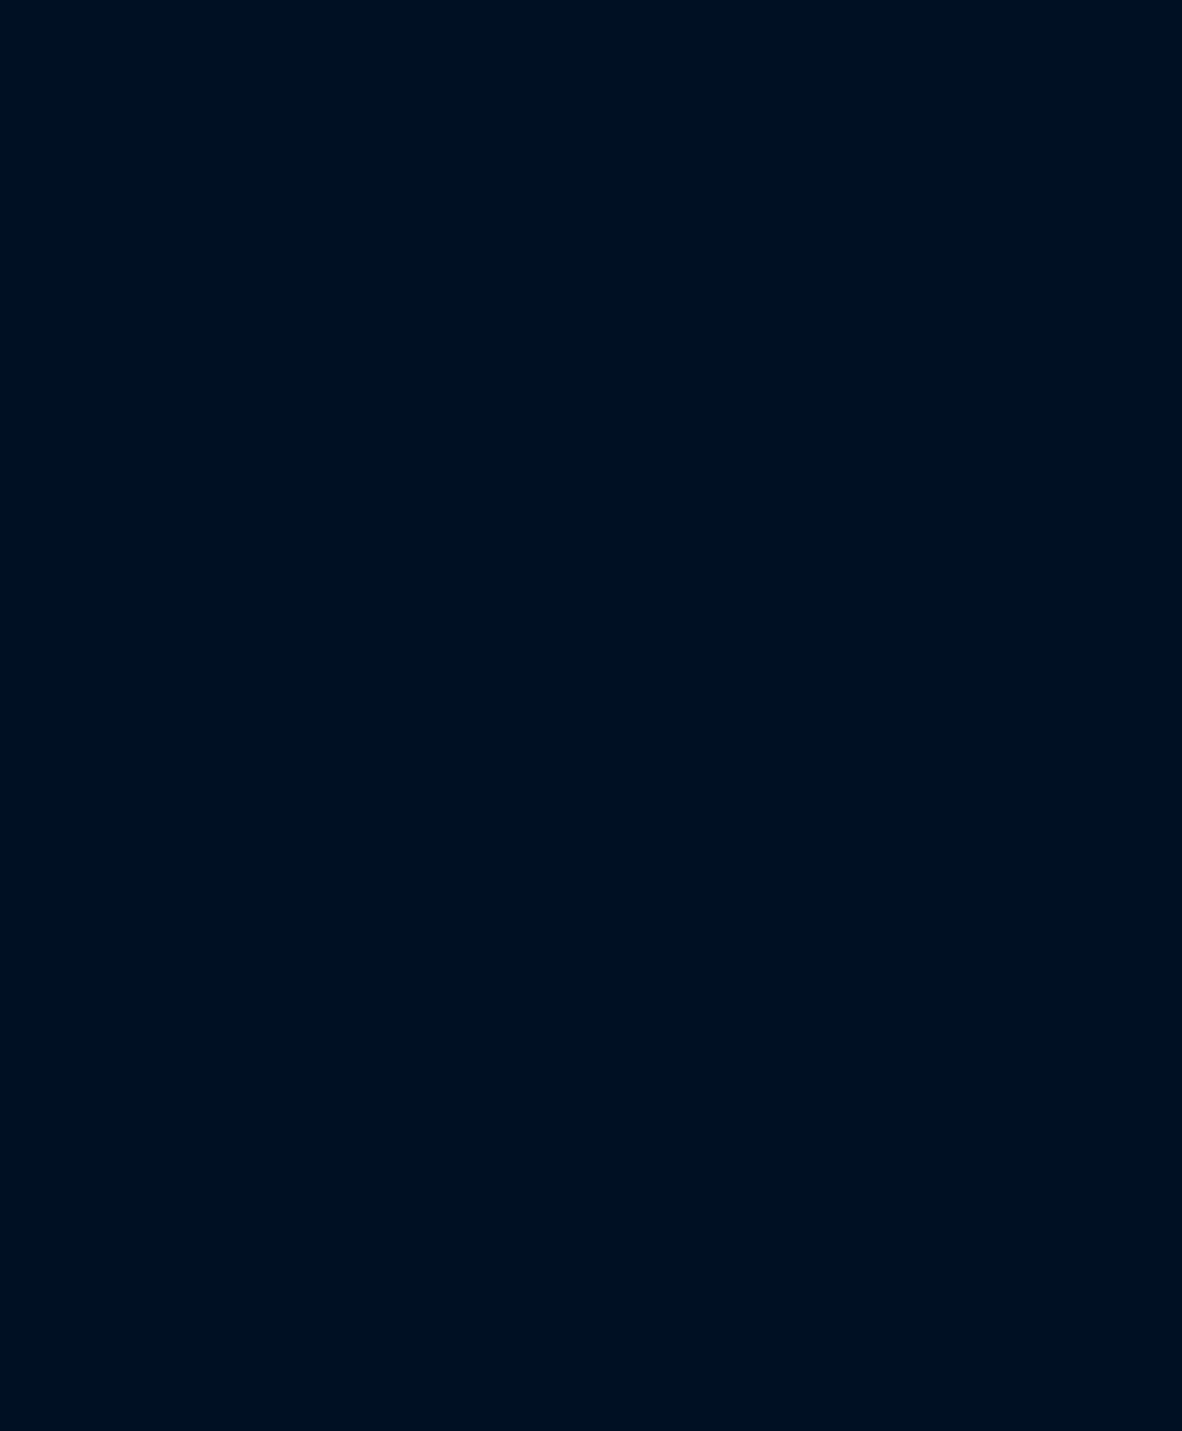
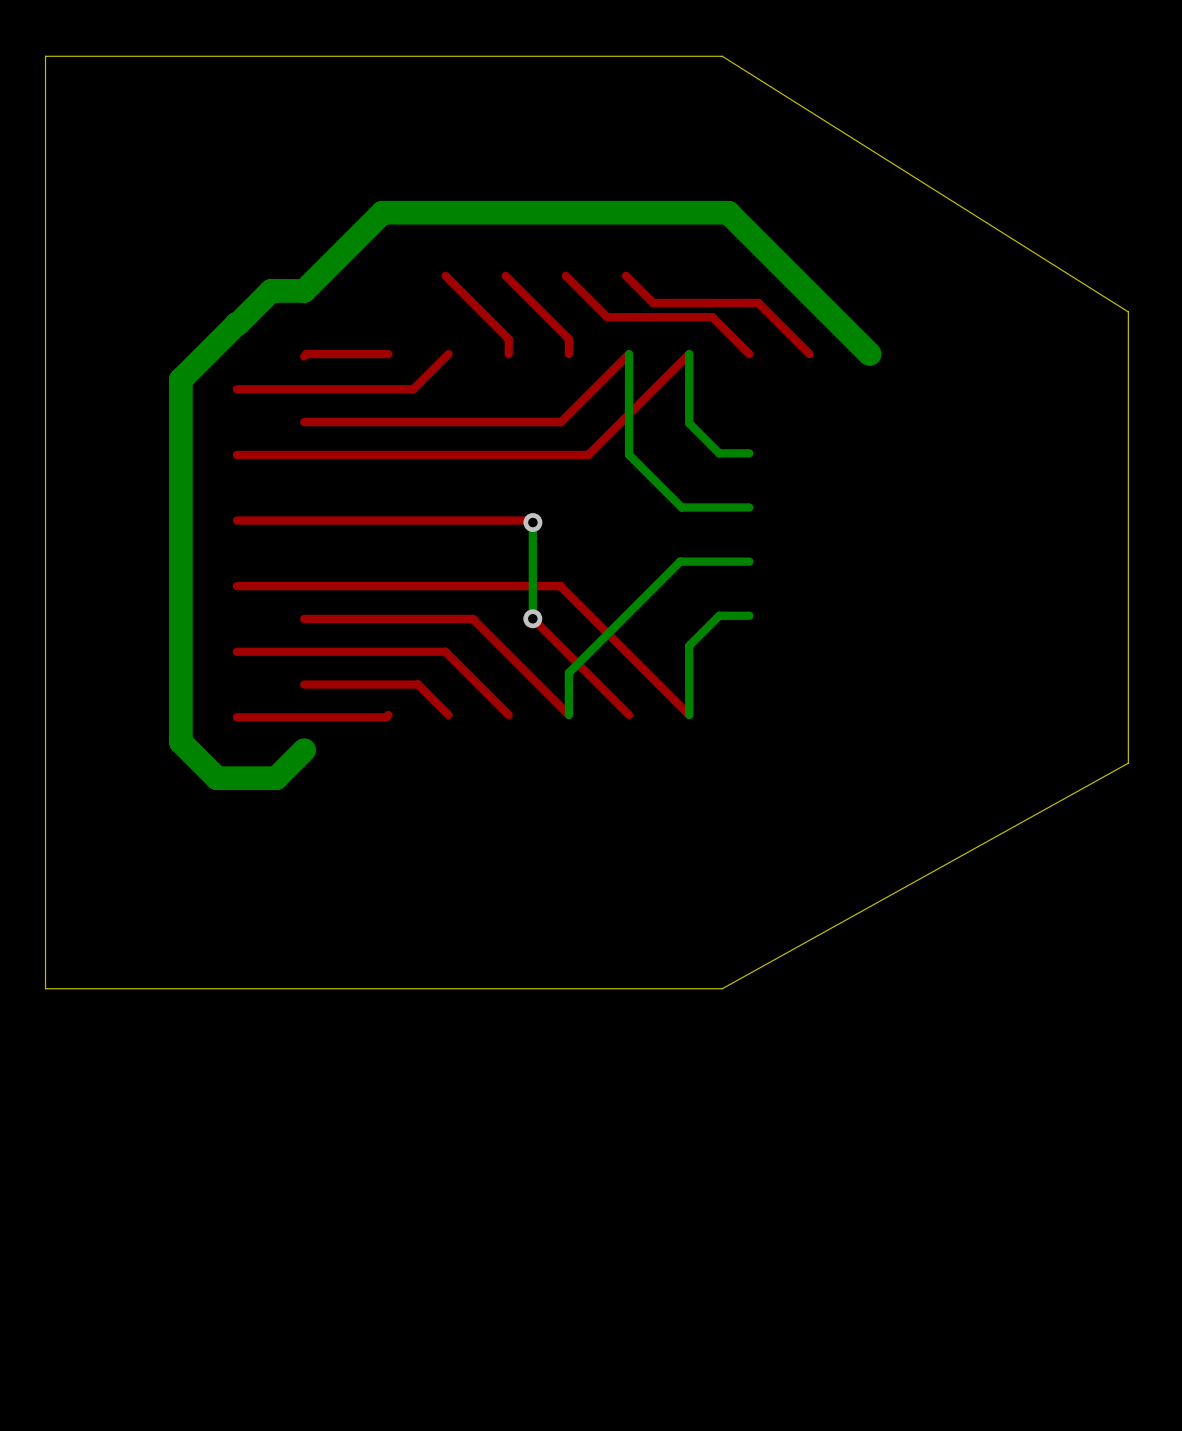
board edge: none -> (722, 56) (1128, 311) (1128, 763) (722, 988) (45, 988) (45, 56) (722, 56)
top track: none -> (445, 275) (508, 339) (508, 354)
top track: none -> (505, 275) (568, 339) (568, 354)
top track: none -> (565, 275) (607, 317) (712, 317) (749, 354)
top track: none -> (626, 275) (653, 302) (758, 302) (809, 354)
top track: none -> (388, 354) (306, 354) (304, 356)
top track: none -> (448, 354) (413, 389) (236, 389)
bottom track: none -> (629, 354) (629, 454) (681, 507) (749, 507)
top track: none -> (629, 354) (561, 422) (304, 422)
bottom track: none -> (689, 354) (689, 423) (719, 453) (749, 453)
top track: none -> (689, 354) (588, 454) (236, 454)
bottom track: none -> (869, 354) (728, 212) (382, 212) (304, 290) (271, 290) (180, 379) (180, 742) (216, 778) (276, 778) (304, 750)
top track: none -> (236, 520) (530, 520) (532, 522)
bottom track: none -> (532, 522) (532, 618)
via: none -> (532, 522)
bottom track: none -> (749, 561) (680, 561) (568, 672) (568, 715)
top track: none -> (236, 586) (560, 586) (689, 715)
bottom track: none -> (749, 615) (719, 615) (689, 645) (689, 715)
top track: none -> (304, 618) (472, 618) (568, 715)
top track: none -> (532, 618) (629, 715)
via: none -> (532, 618)
top track: none -> (236, 651) (445, 651) (508, 715)
top track: none -> (304, 684) (418, 684) (448, 715)
top track: none -> (388, 715) (386, 717) (236, 717)

